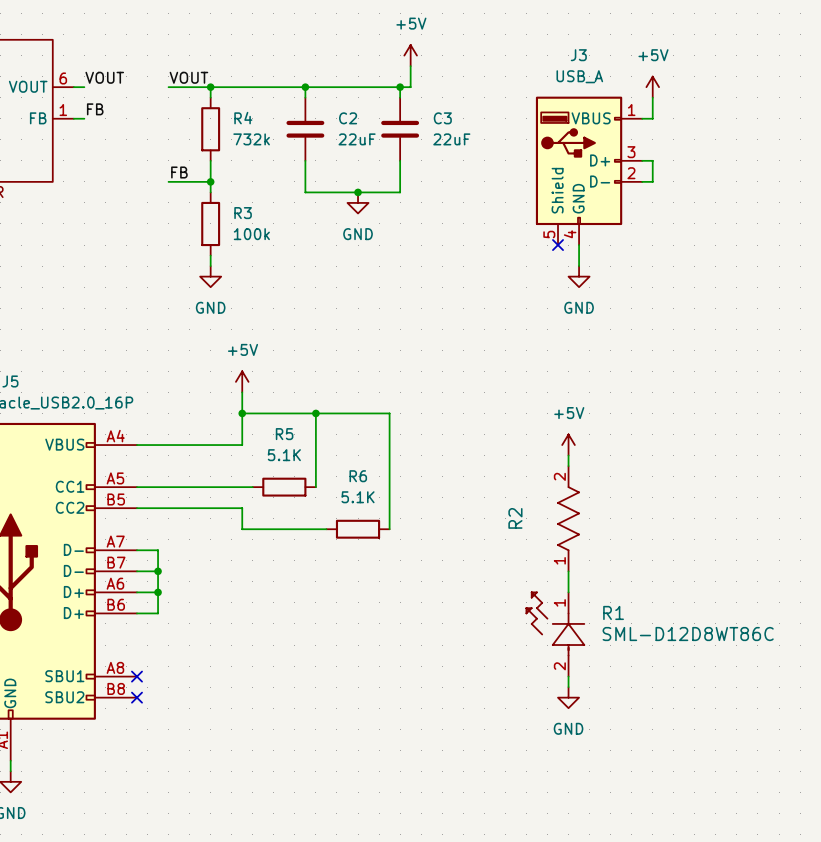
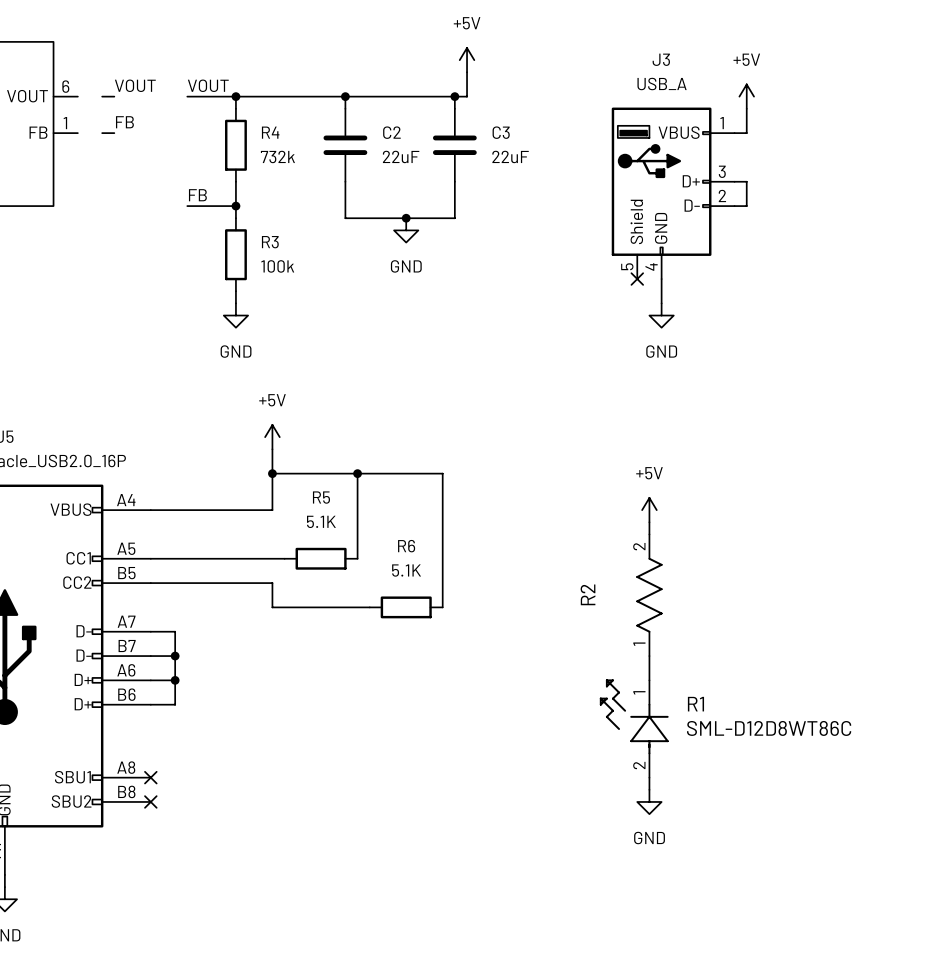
label position: VOUT (104, 77) -> VOUT (135, 85)
wire: (73, 87) (84, 87) -> (102, 96) (114, 96)
label position: FB (95, 109) -> FB (124, 122)
wire: (73, 118) (84, 118) -> (102, 133) (114, 133)

